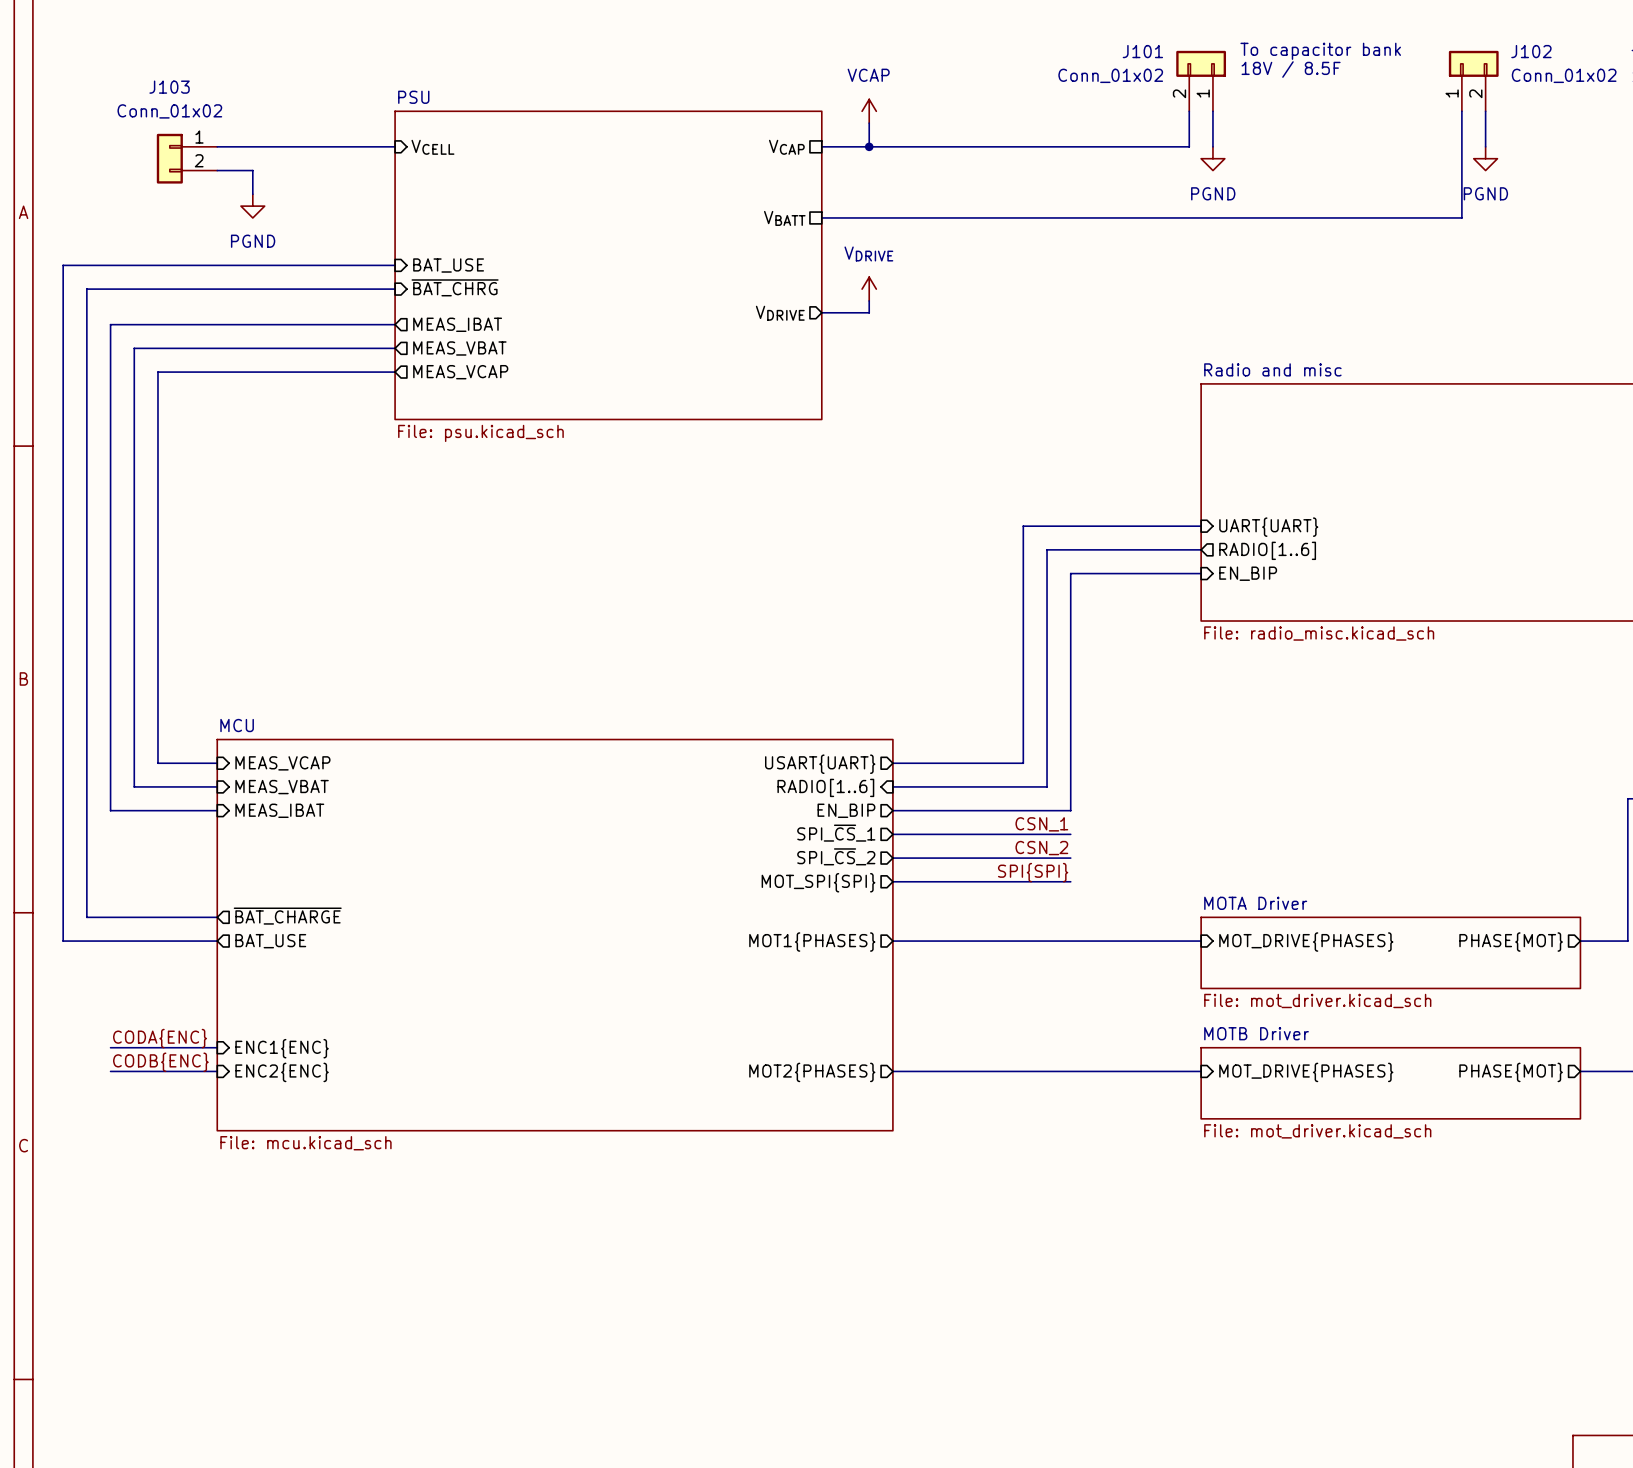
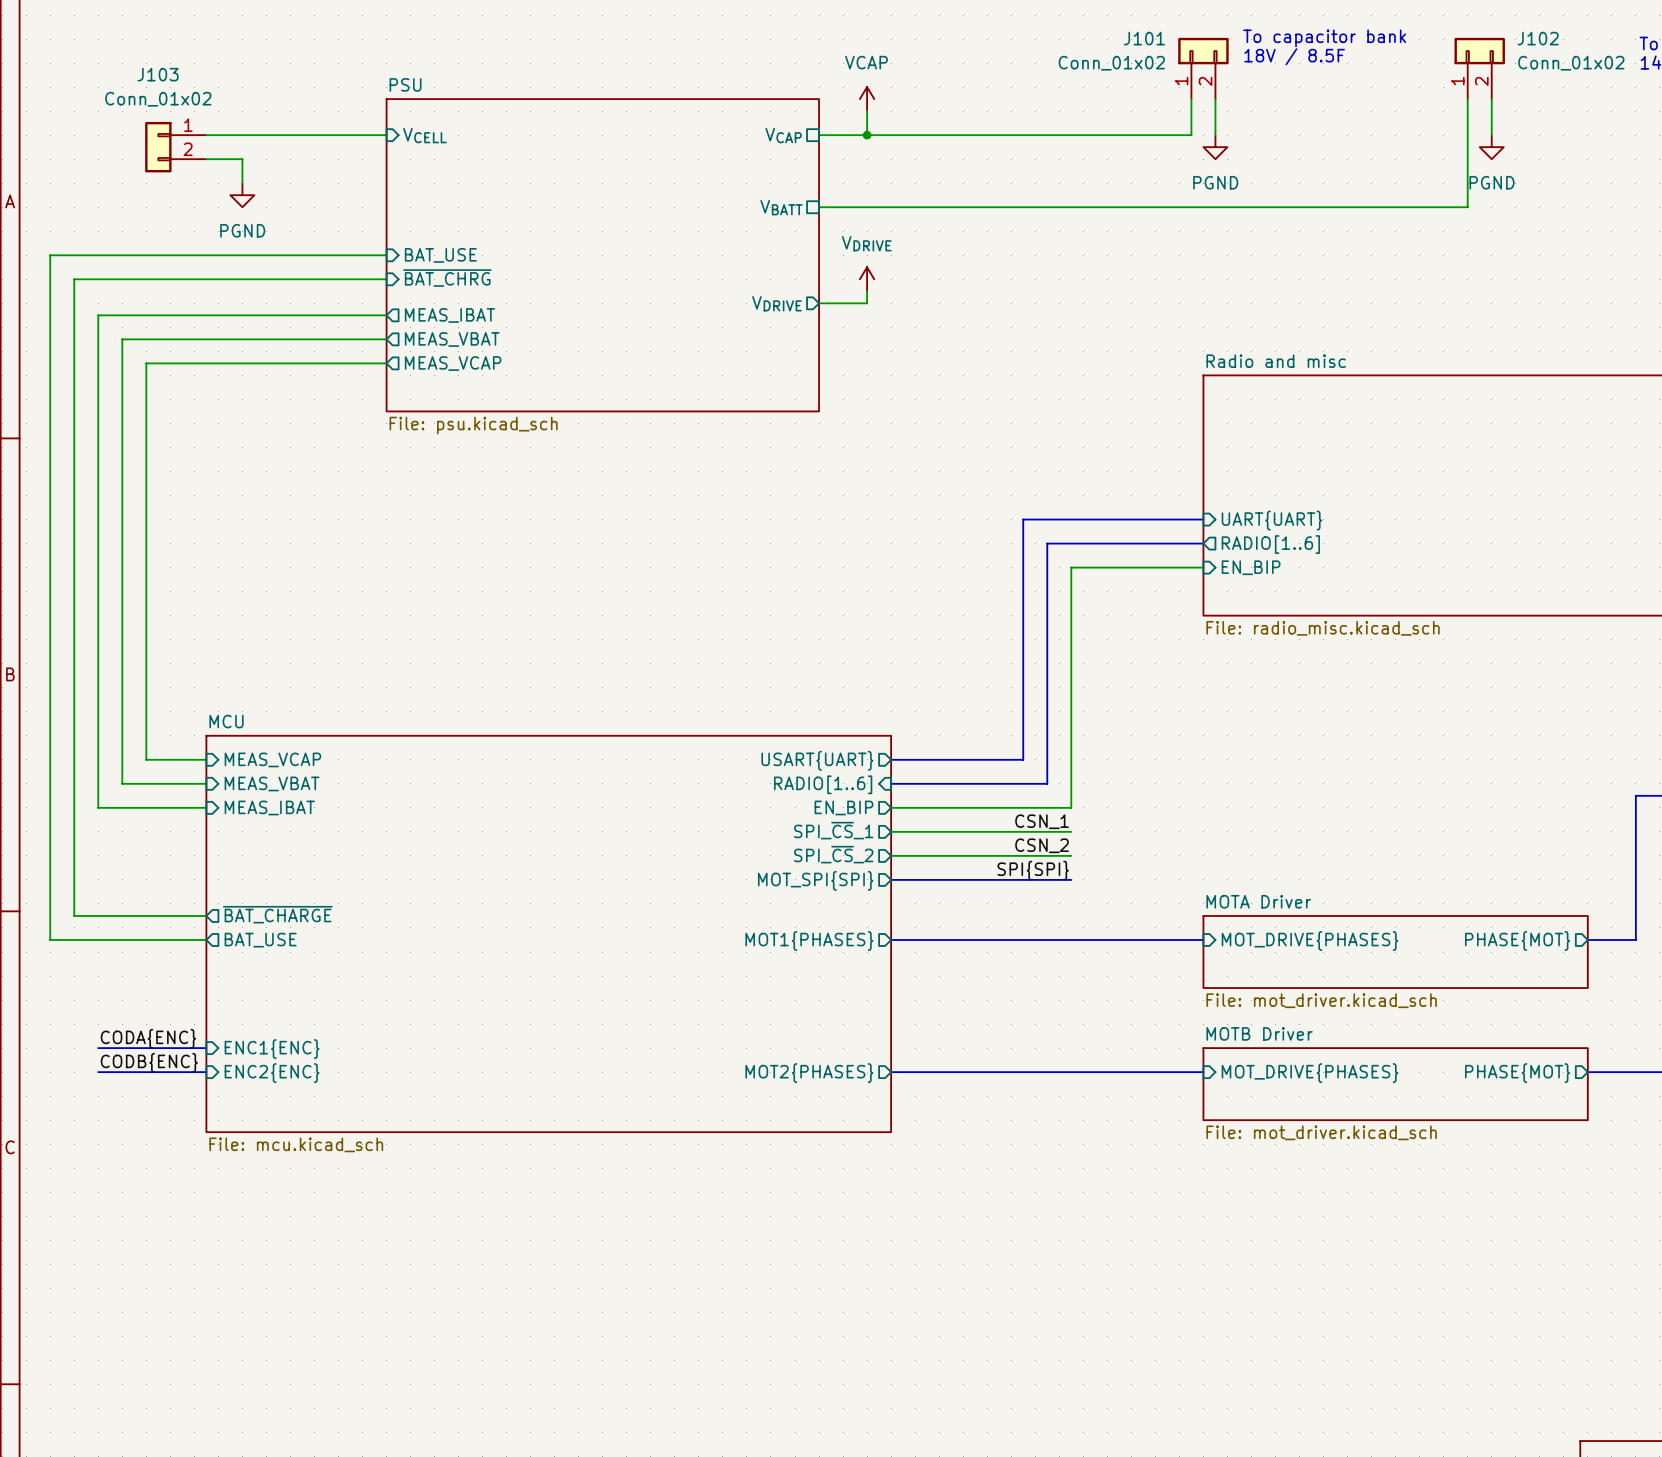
J101 flip: as is (1201, 63) -> left-right (1203, 51)

